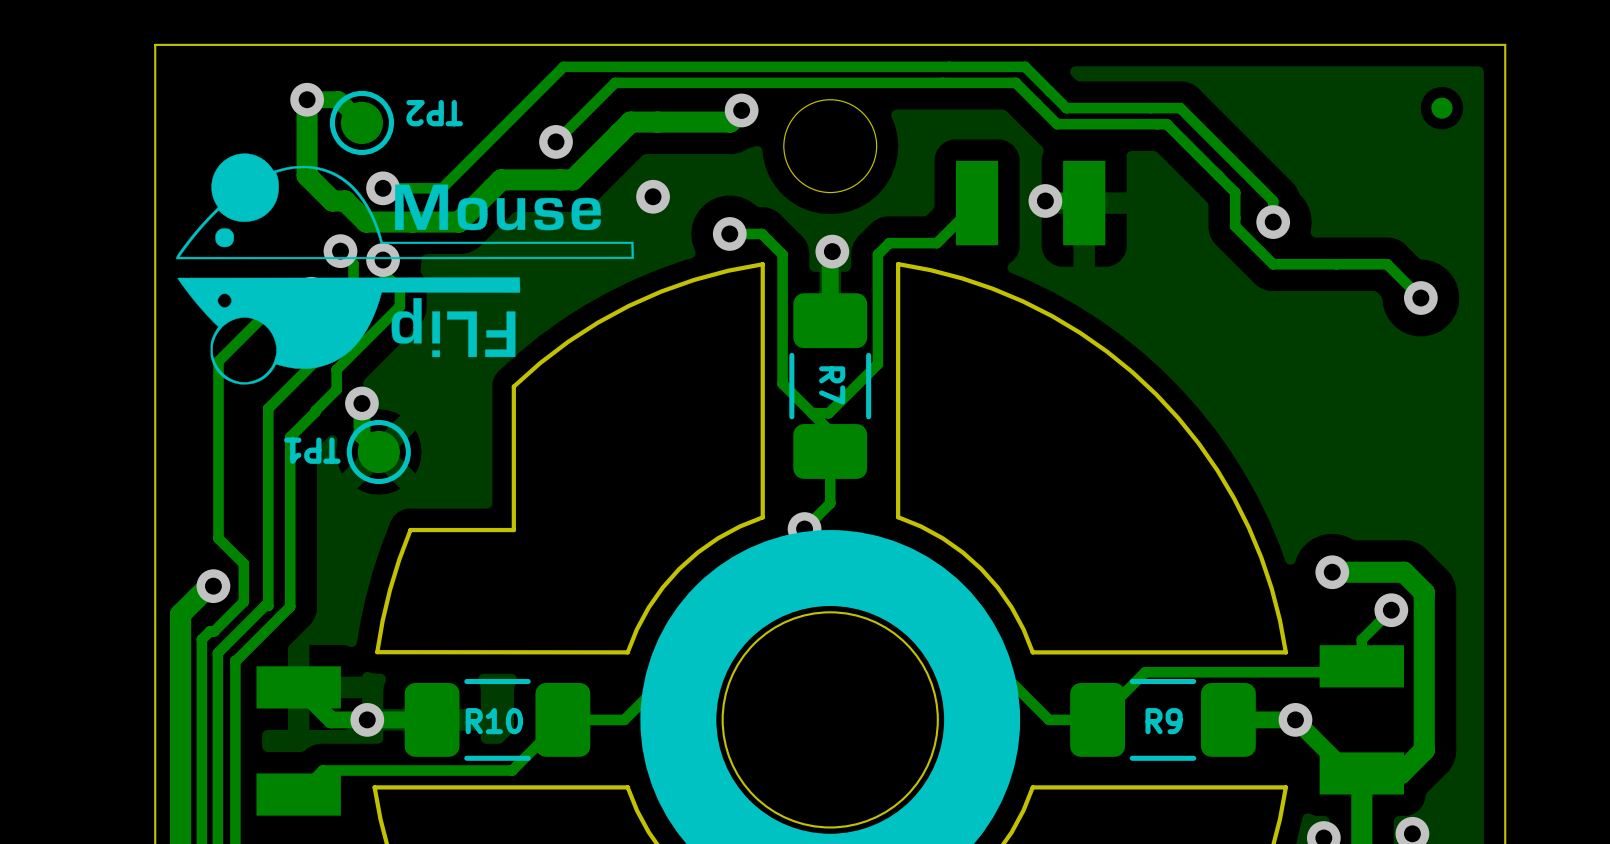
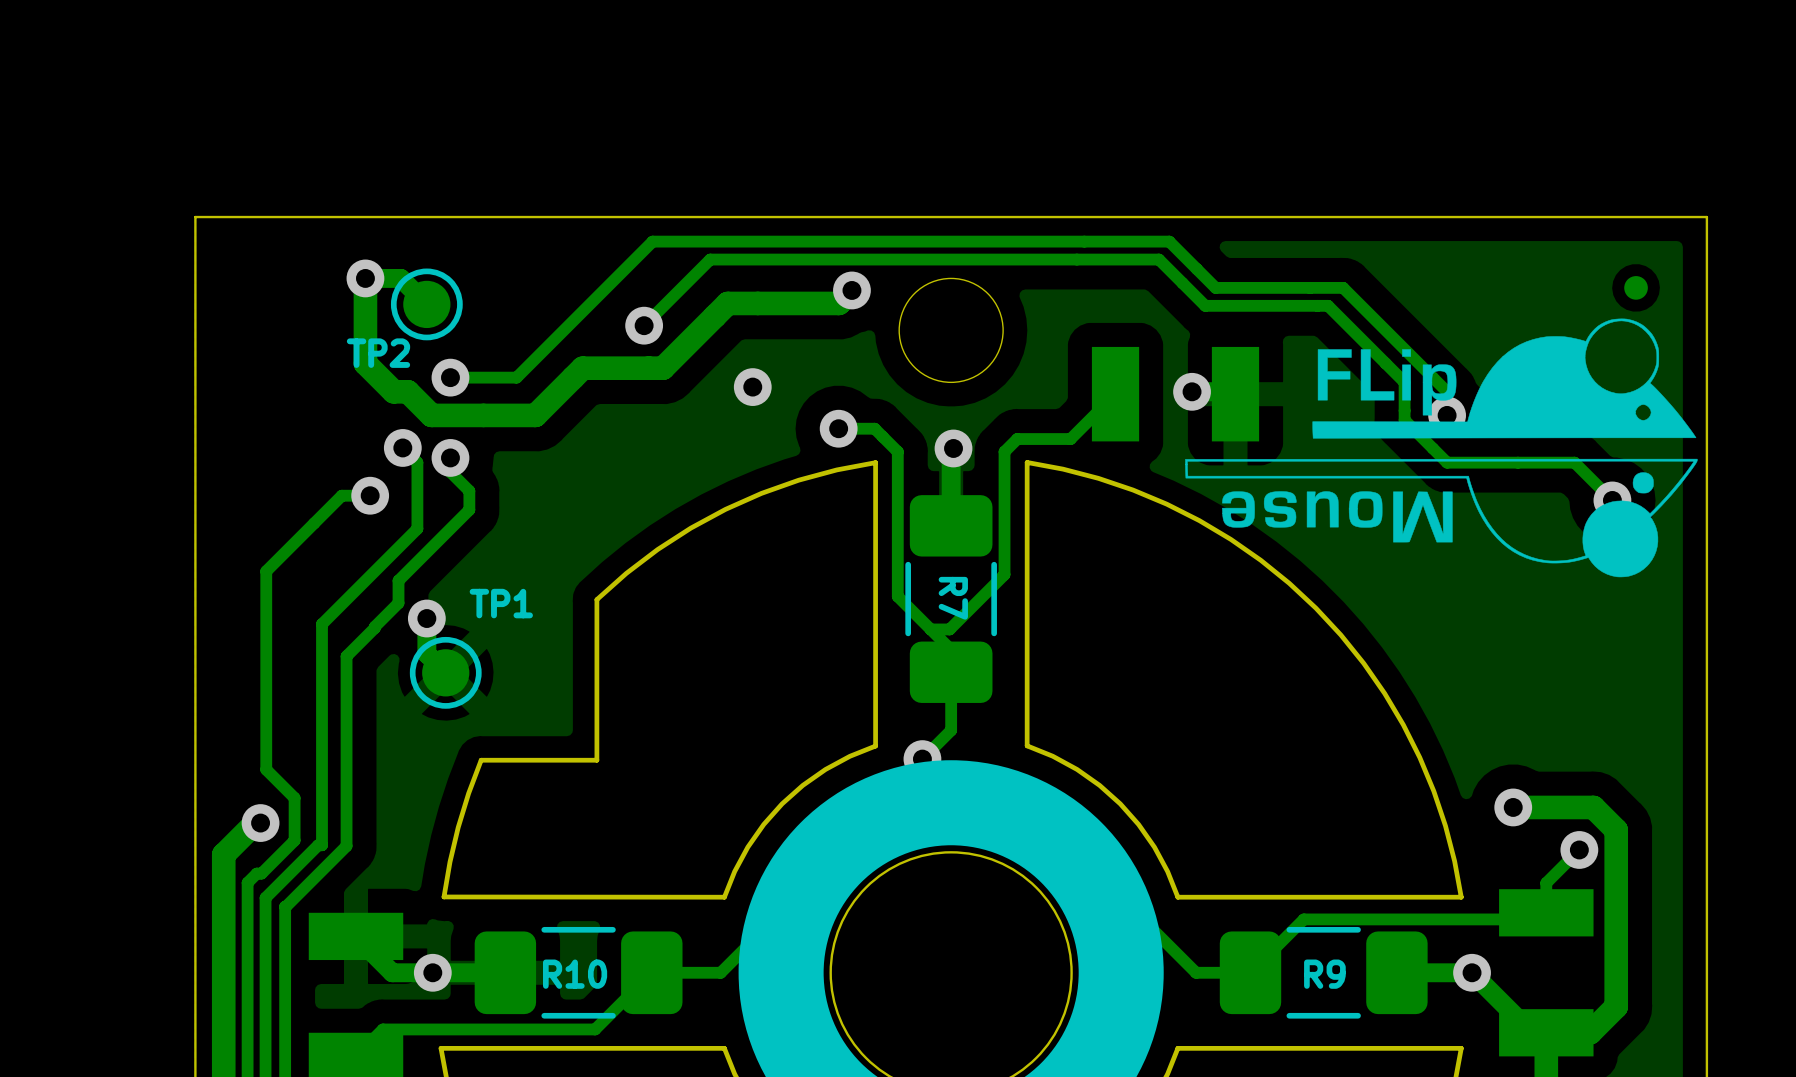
TP2 name rotation: 0° (434, 113) -> 180° (378, 353)
TP2 name position: TP2 (434, 113) -> TP2 (378, 353)
drawing: none -> [1185, 318, 1698, 578]
drawing: [176, 153, 634, 385] -> none
TP1 name rotation: 0° (312, 450) -> 180° (501, 603)
TP1 name position: TP1 (312, 450) -> TP1 (501, 603)

